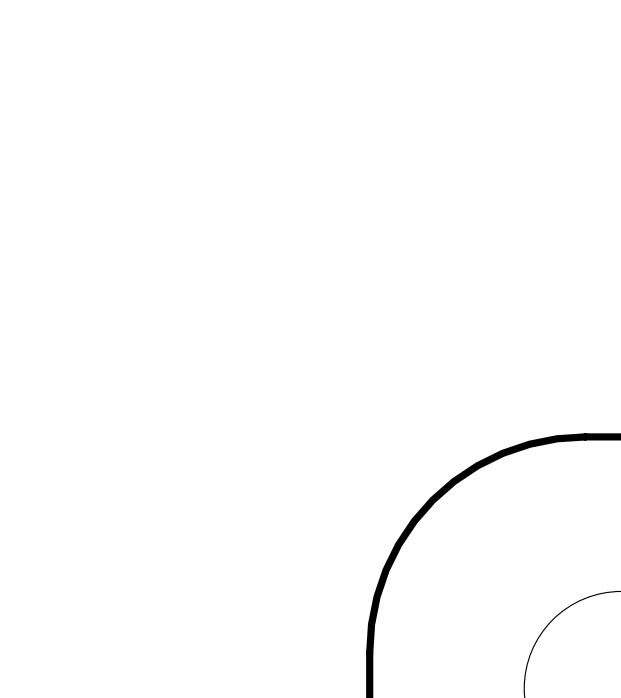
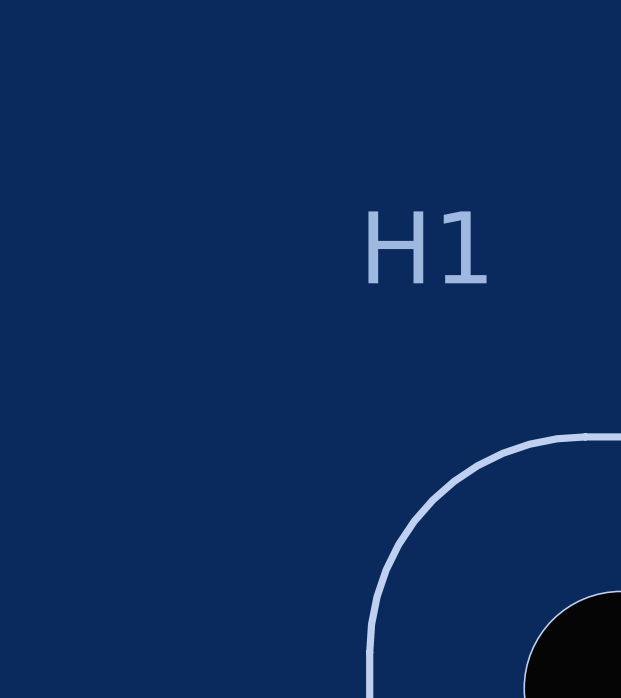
H1 name: none -> H1 (427, 247)

